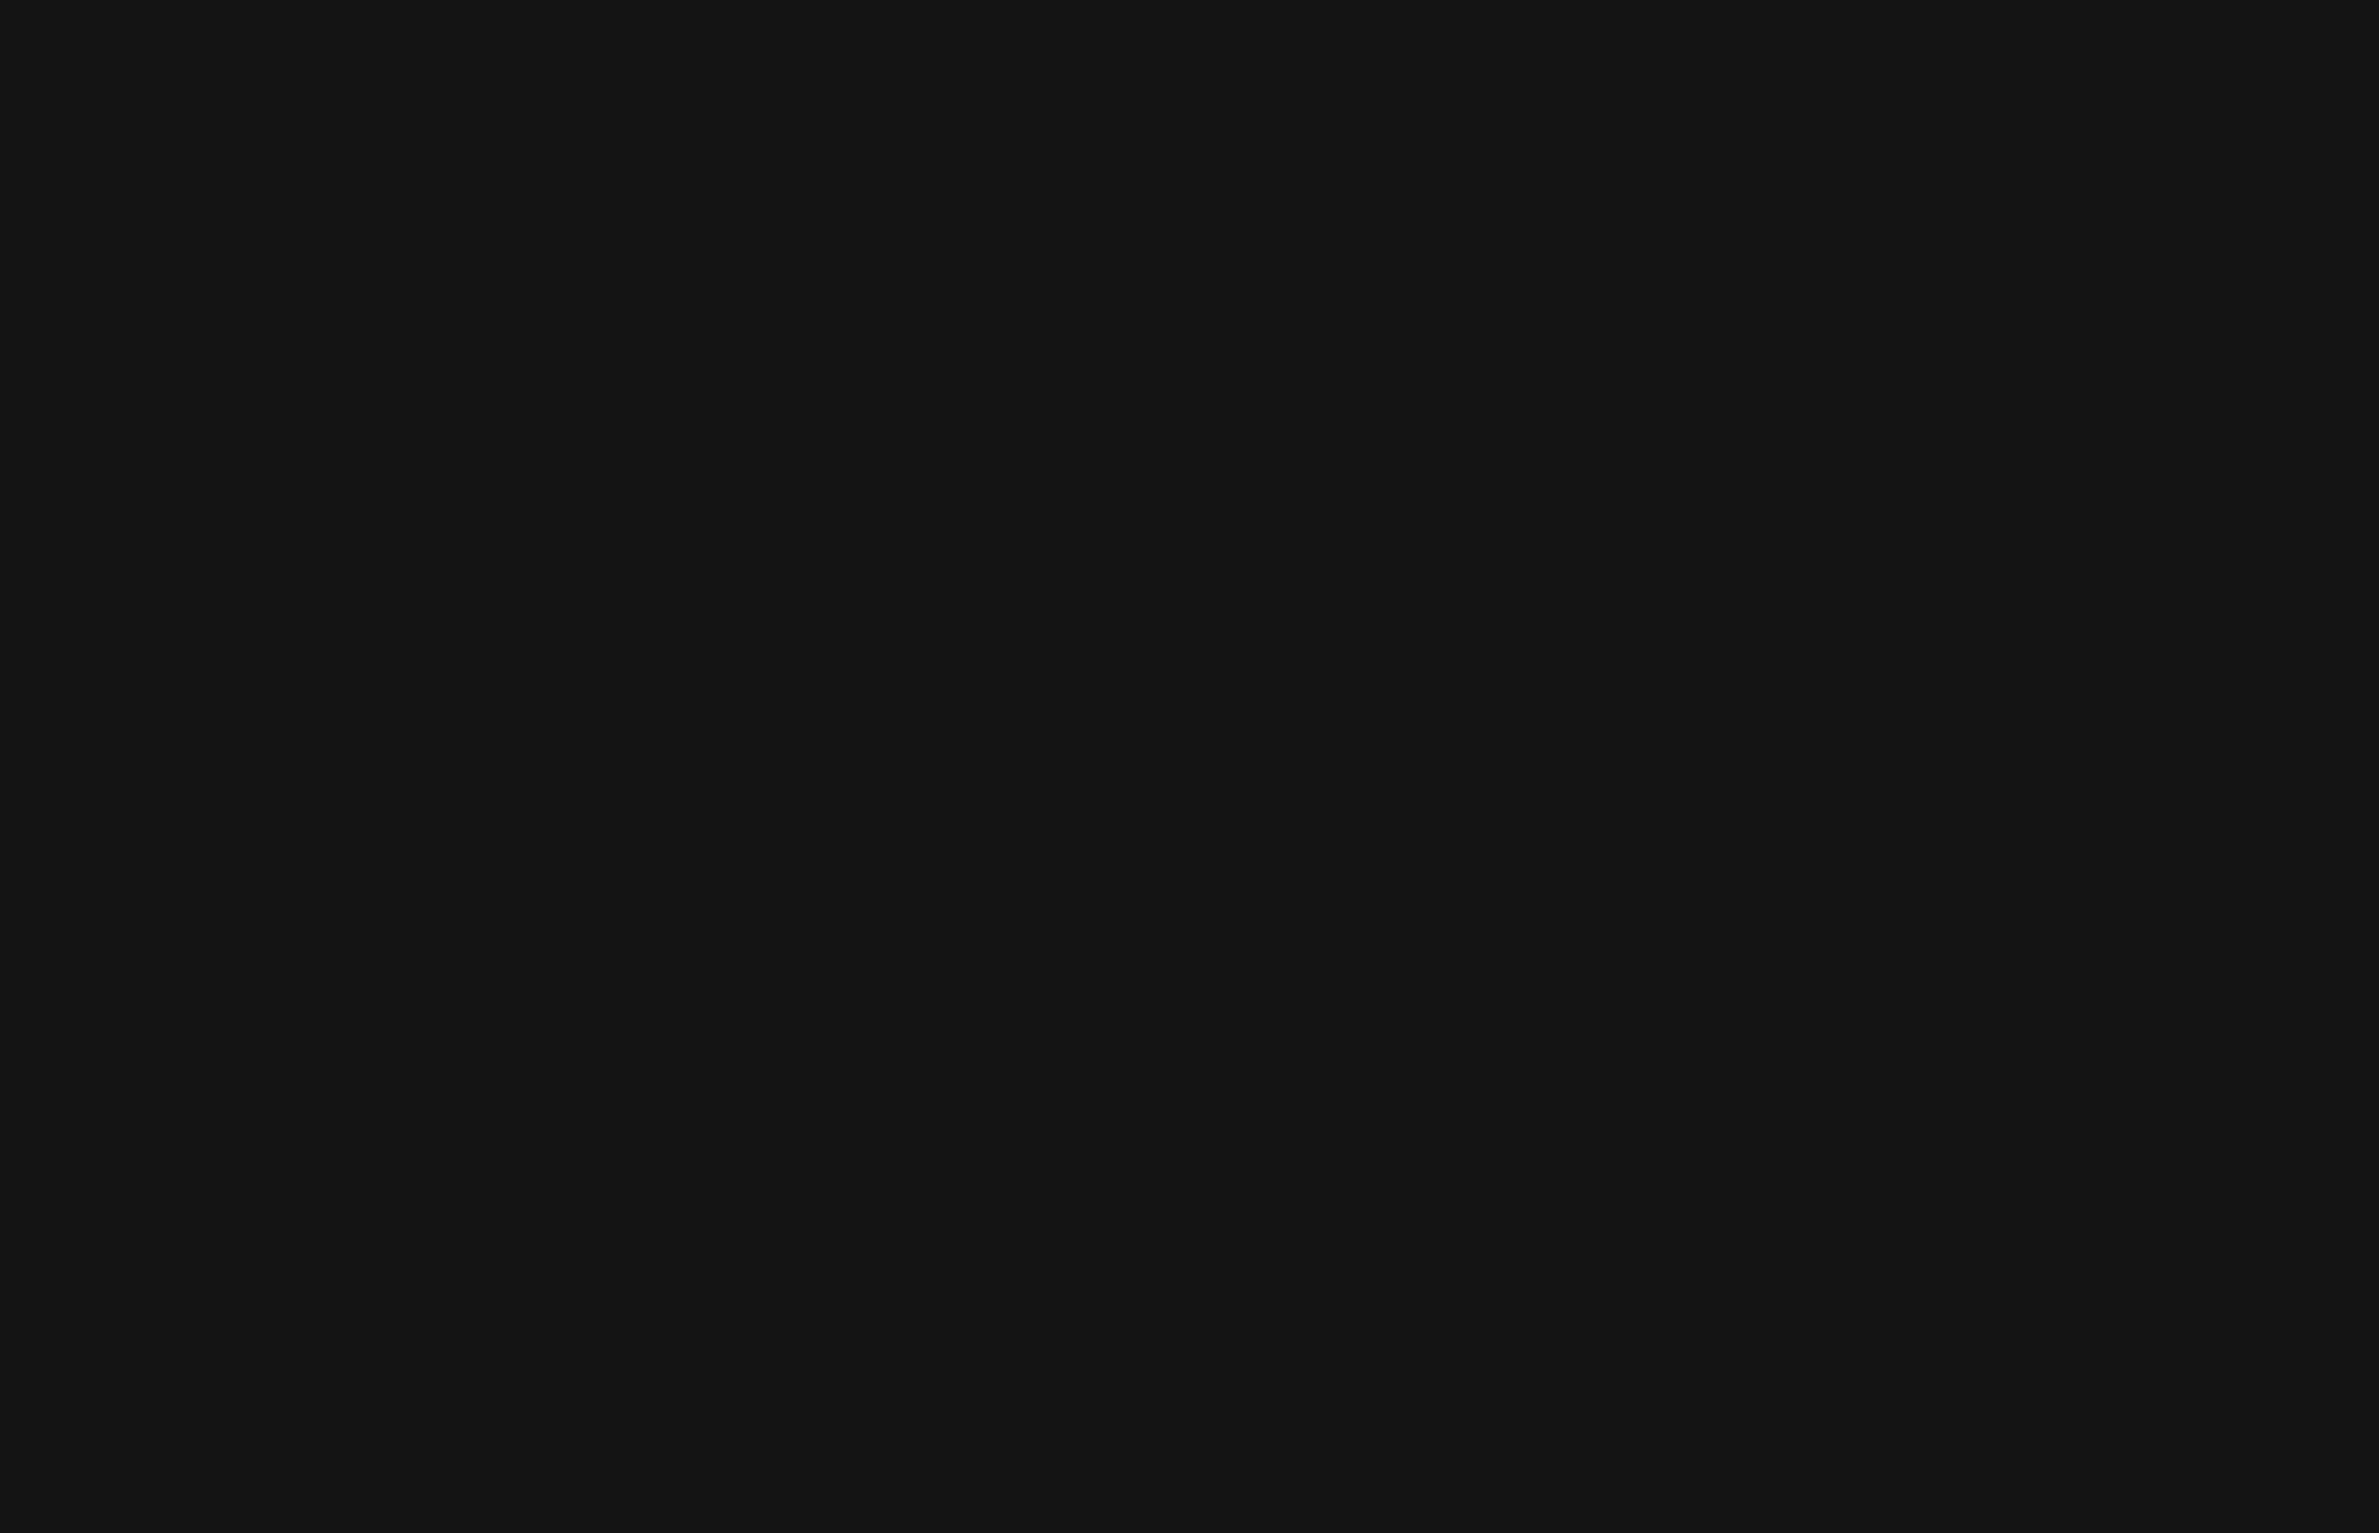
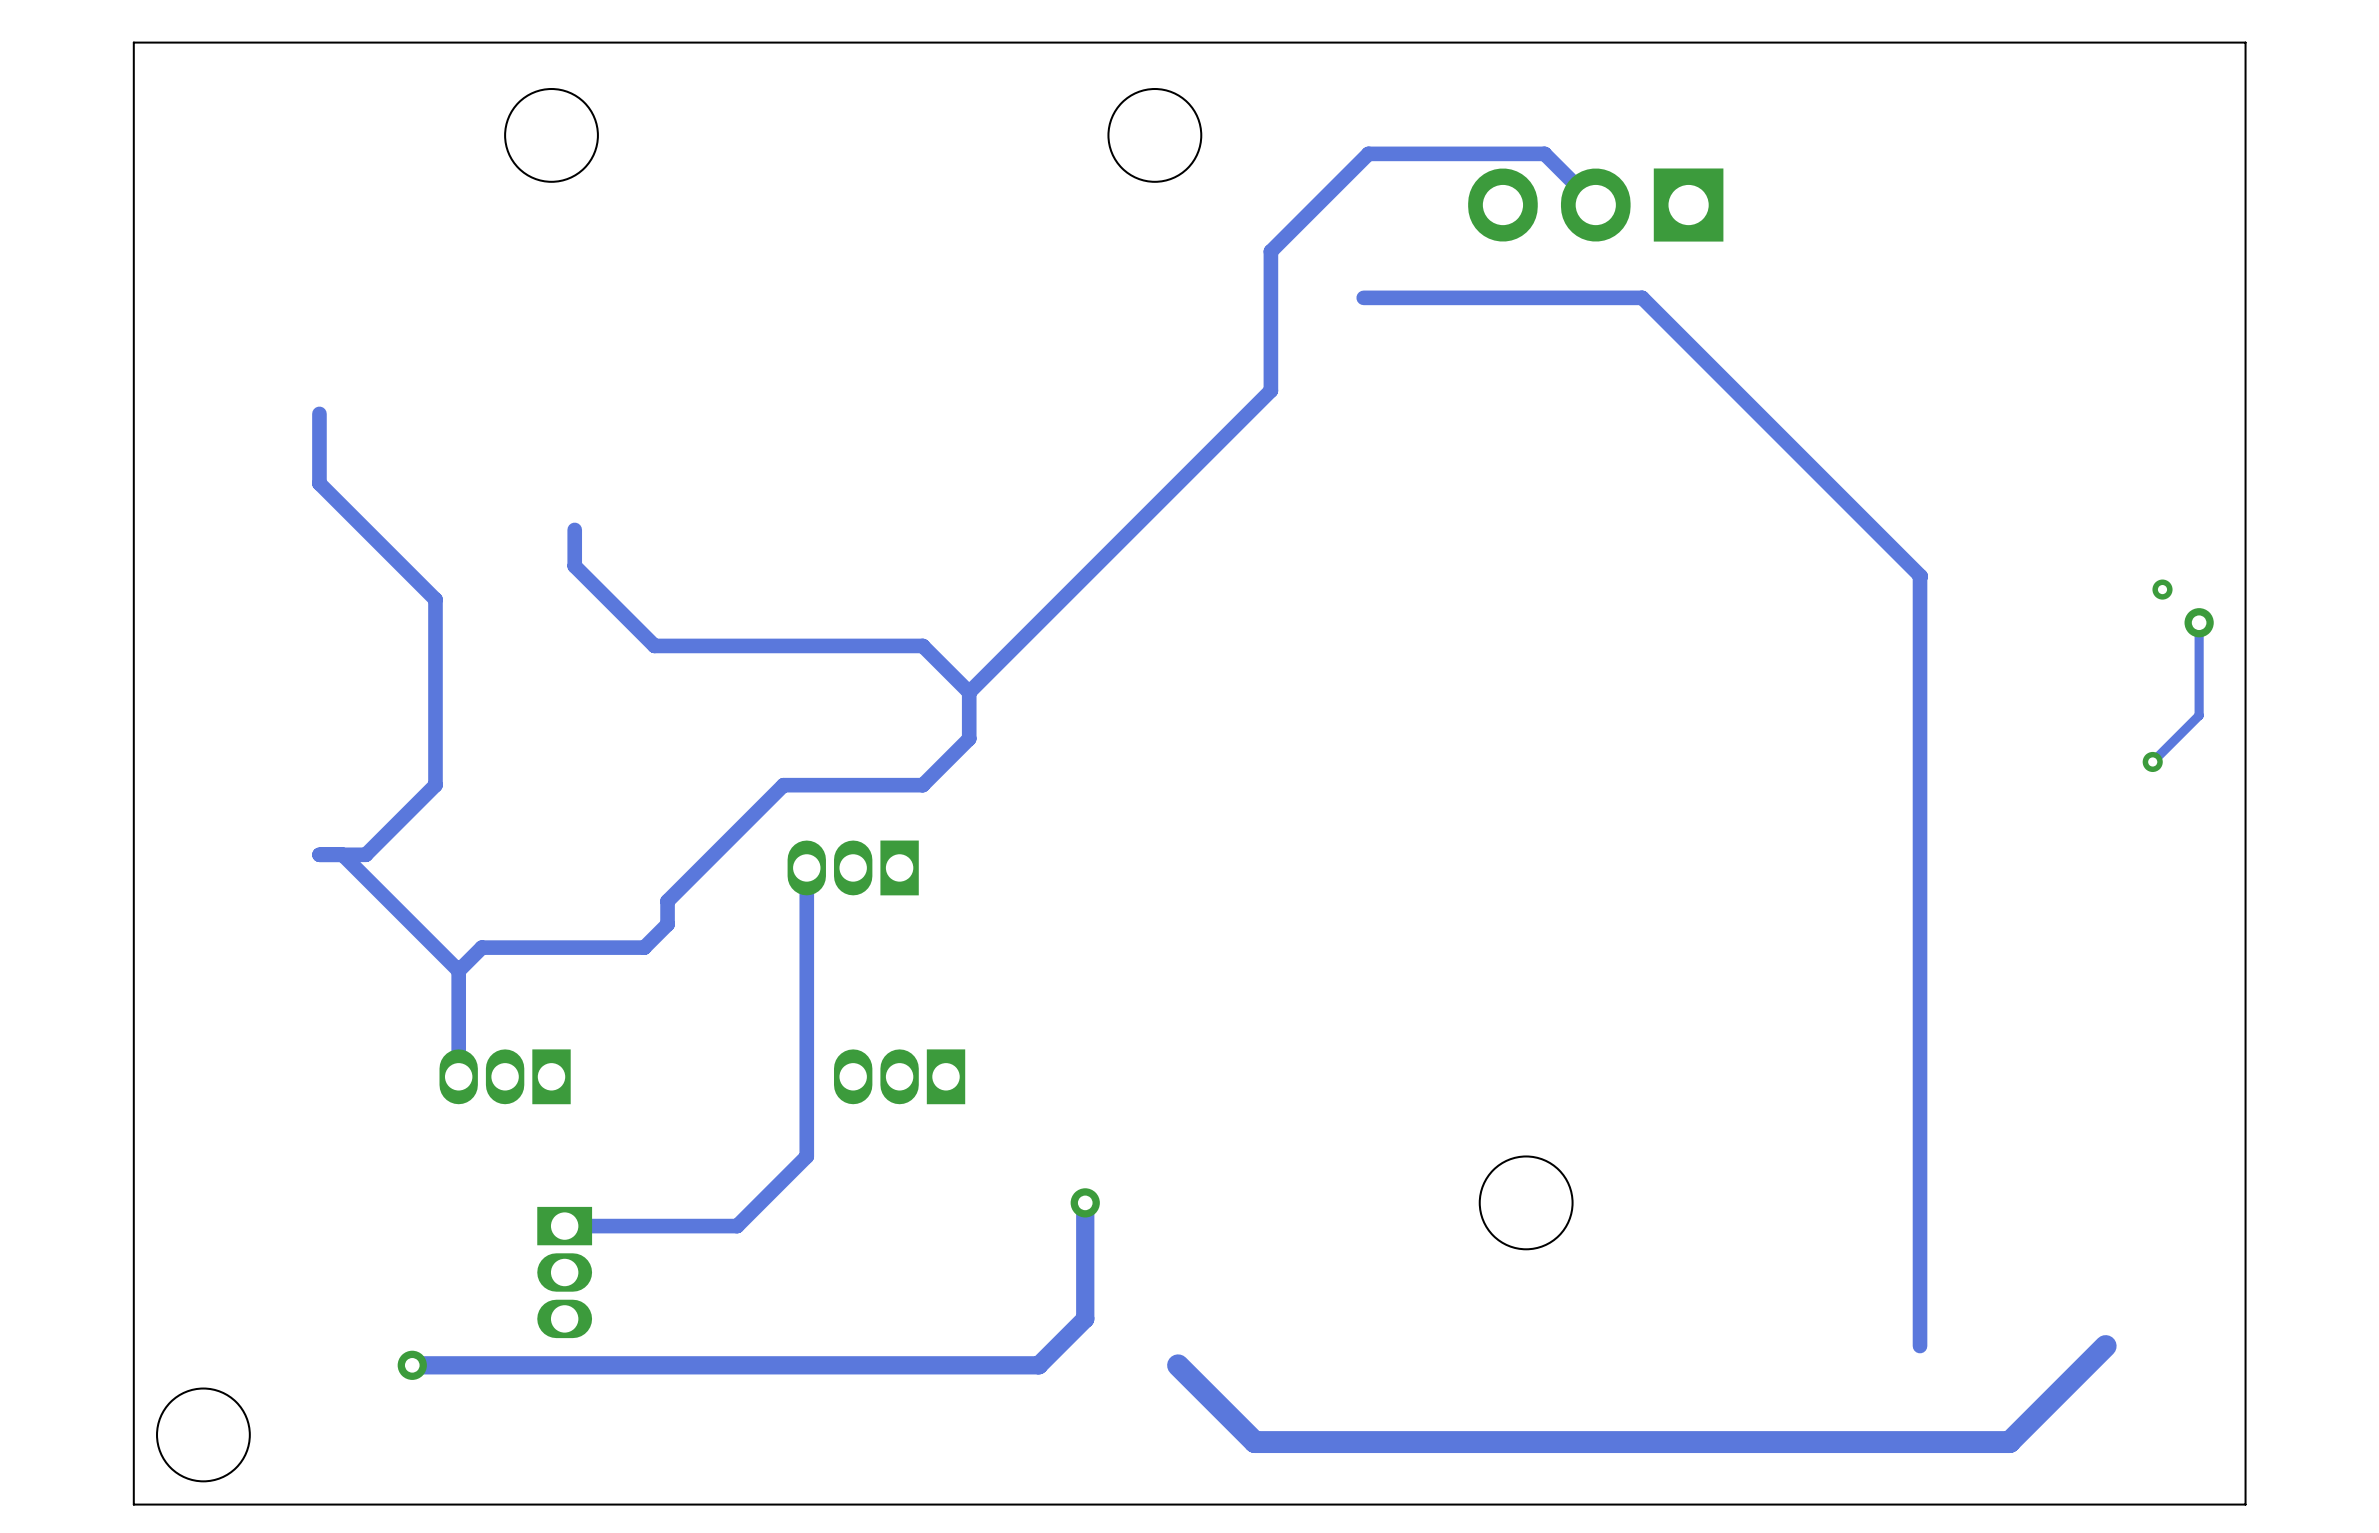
board edge: none -> (2245, 42) (2245, 1504) (133, 1504) (133, 42) (2245, 42)
round board edge: none -> [504, 88, 599, 183]
round board edge: none -> [1107, 88, 1203, 183]
track: none -> (1595, 205) (1544, 153) (1368, 153) (1270, 251) (1270, 390) (969, 692)
part: none -> (1595, 205)
track: none -> (1363, 297) (1642, 297) (1920, 576) (1920, 1346)
track: none -> (319, 413) (319, 483) (435, 599) (435, 785) (365, 854) (319, 854)
track: none -> (574, 529) (574, 566) (654, 645) (922, 645) (969, 692)
via: none -> (2162, 589)
track: none -> (2199, 622) (2199, 715) (2152, 761)
via: none -> (2199, 622)
track: none -> (969, 692) (969, 738) (922, 785) (783, 785) (667, 901) (667, 924) (644, 947) (481, 947) (458, 970)
via: none -> (2152, 761)
track: none -> (342, 854) (458, 970)
track: none -> (806, 867) (806, 1156) (737, 1226) (564, 1226)
part: none -> (853, 867)
track: none -> (458, 970) (458, 1076)
part: none -> (505, 1076)
part: none -> (899, 1076)
round board edge: none -> [1478, 1155, 1574, 1251]
track: none -> (1085, 1202) (1085, 1318) (1038, 1365) (412, 1365)
via: none -> (1085, 1202)
part: none -> (564, 1272)
track: none -> (2105, 1346) (2009, 1442) (1254, 1442) (1178, 1365)
via: none -> (412, 1365)
round board edge: none -> [156, 1387, 251, 1483]

